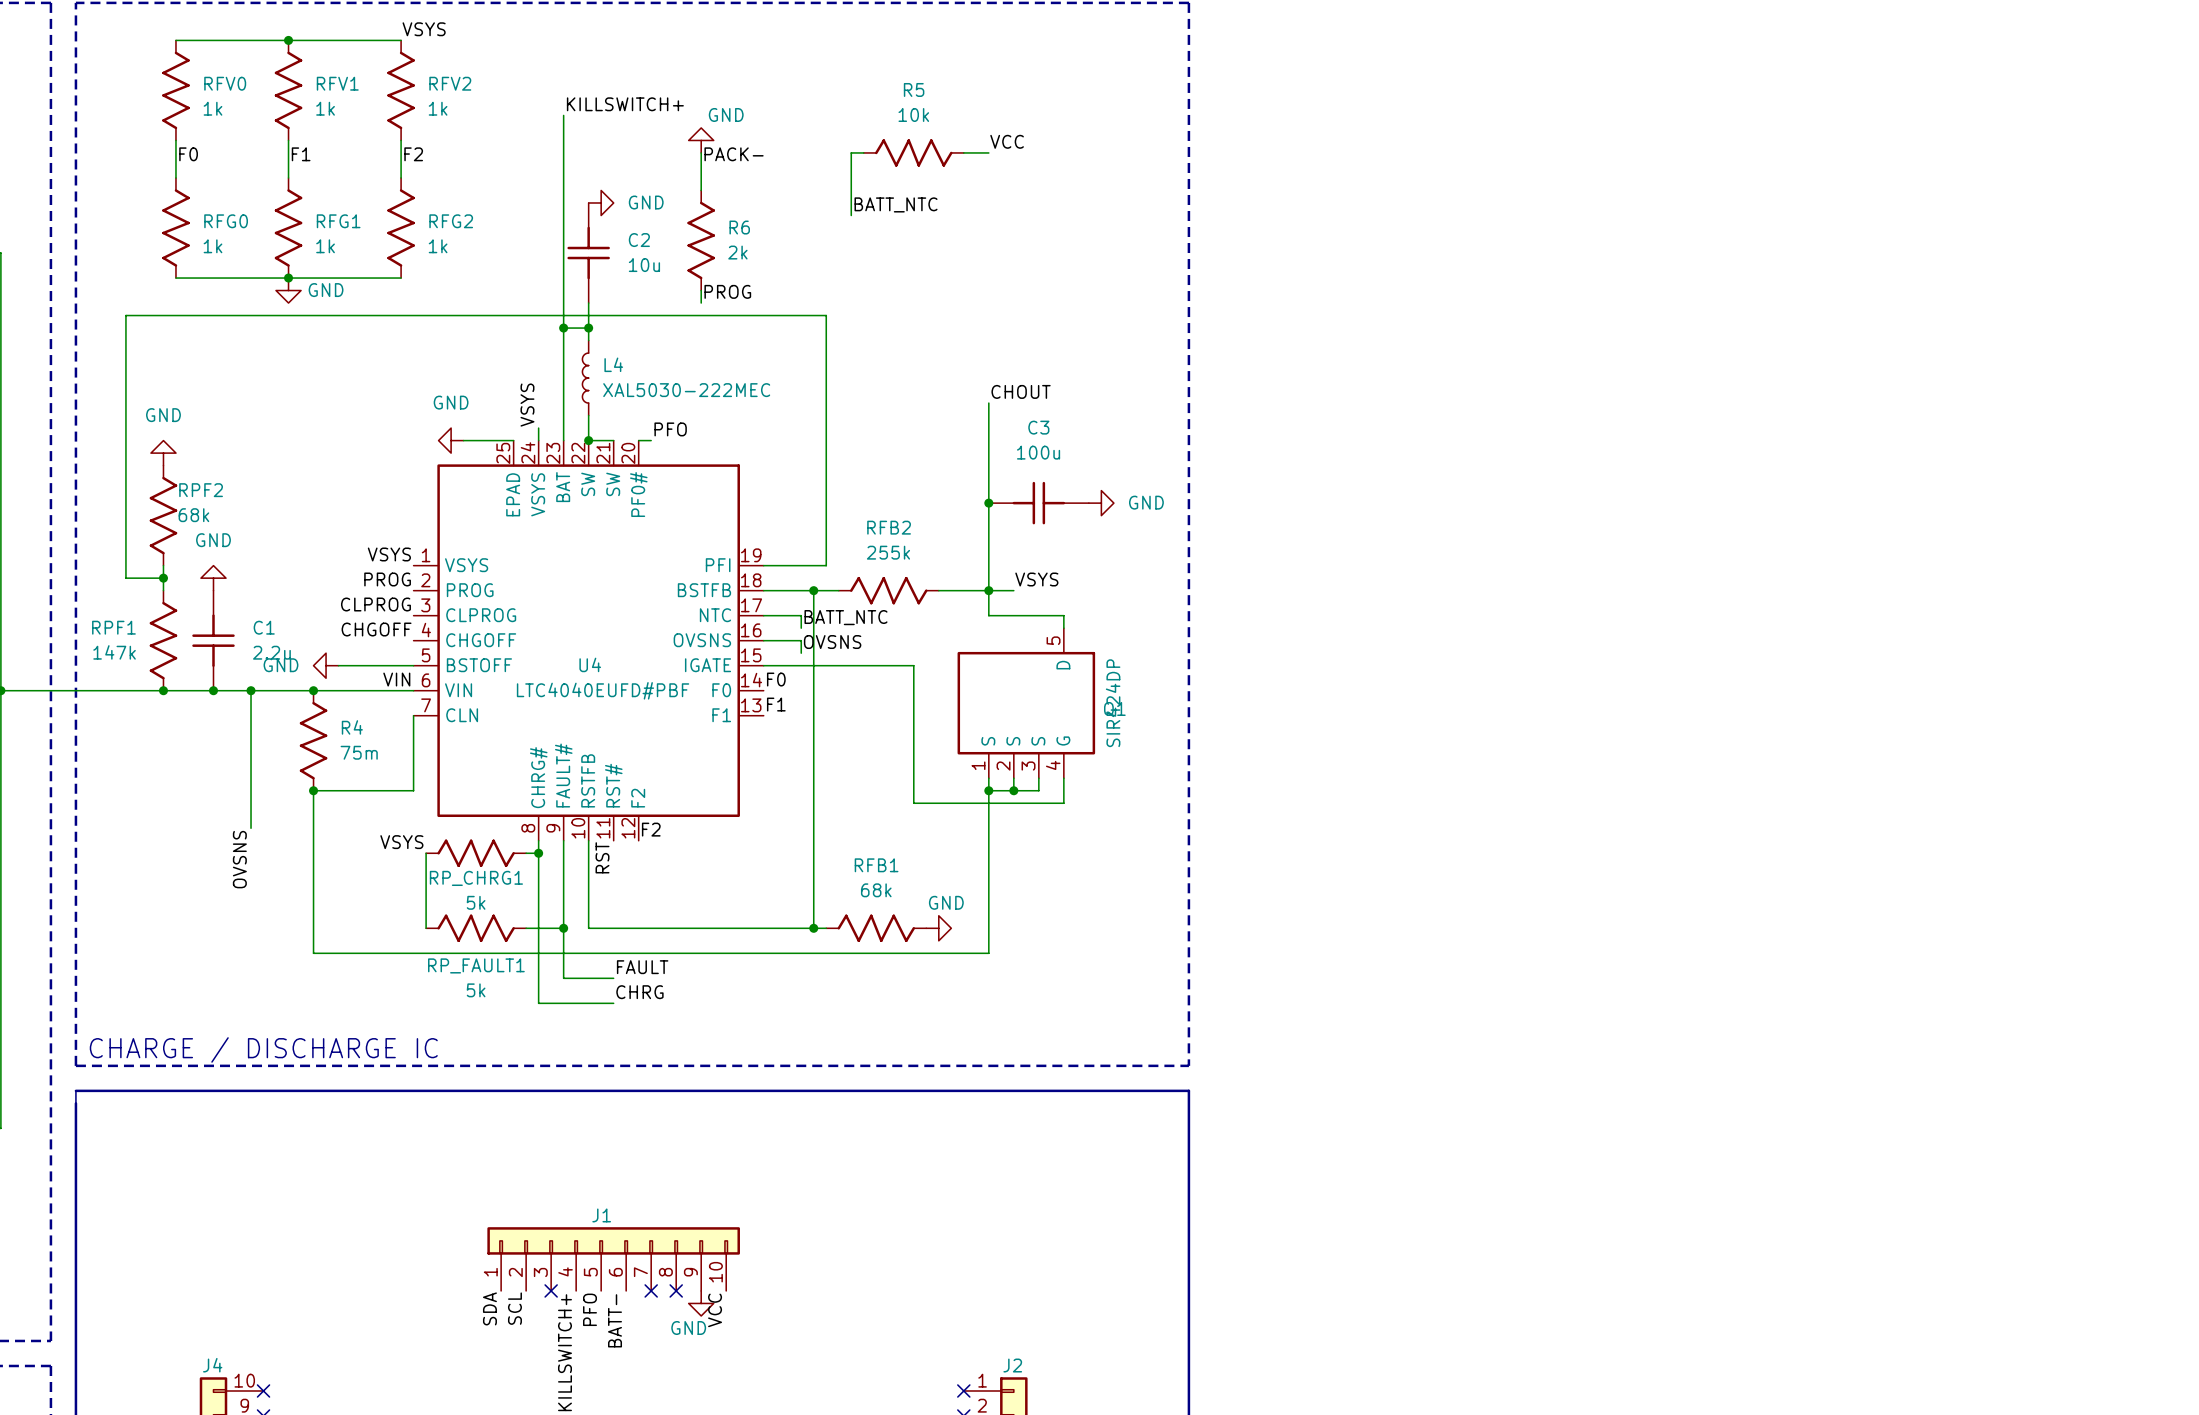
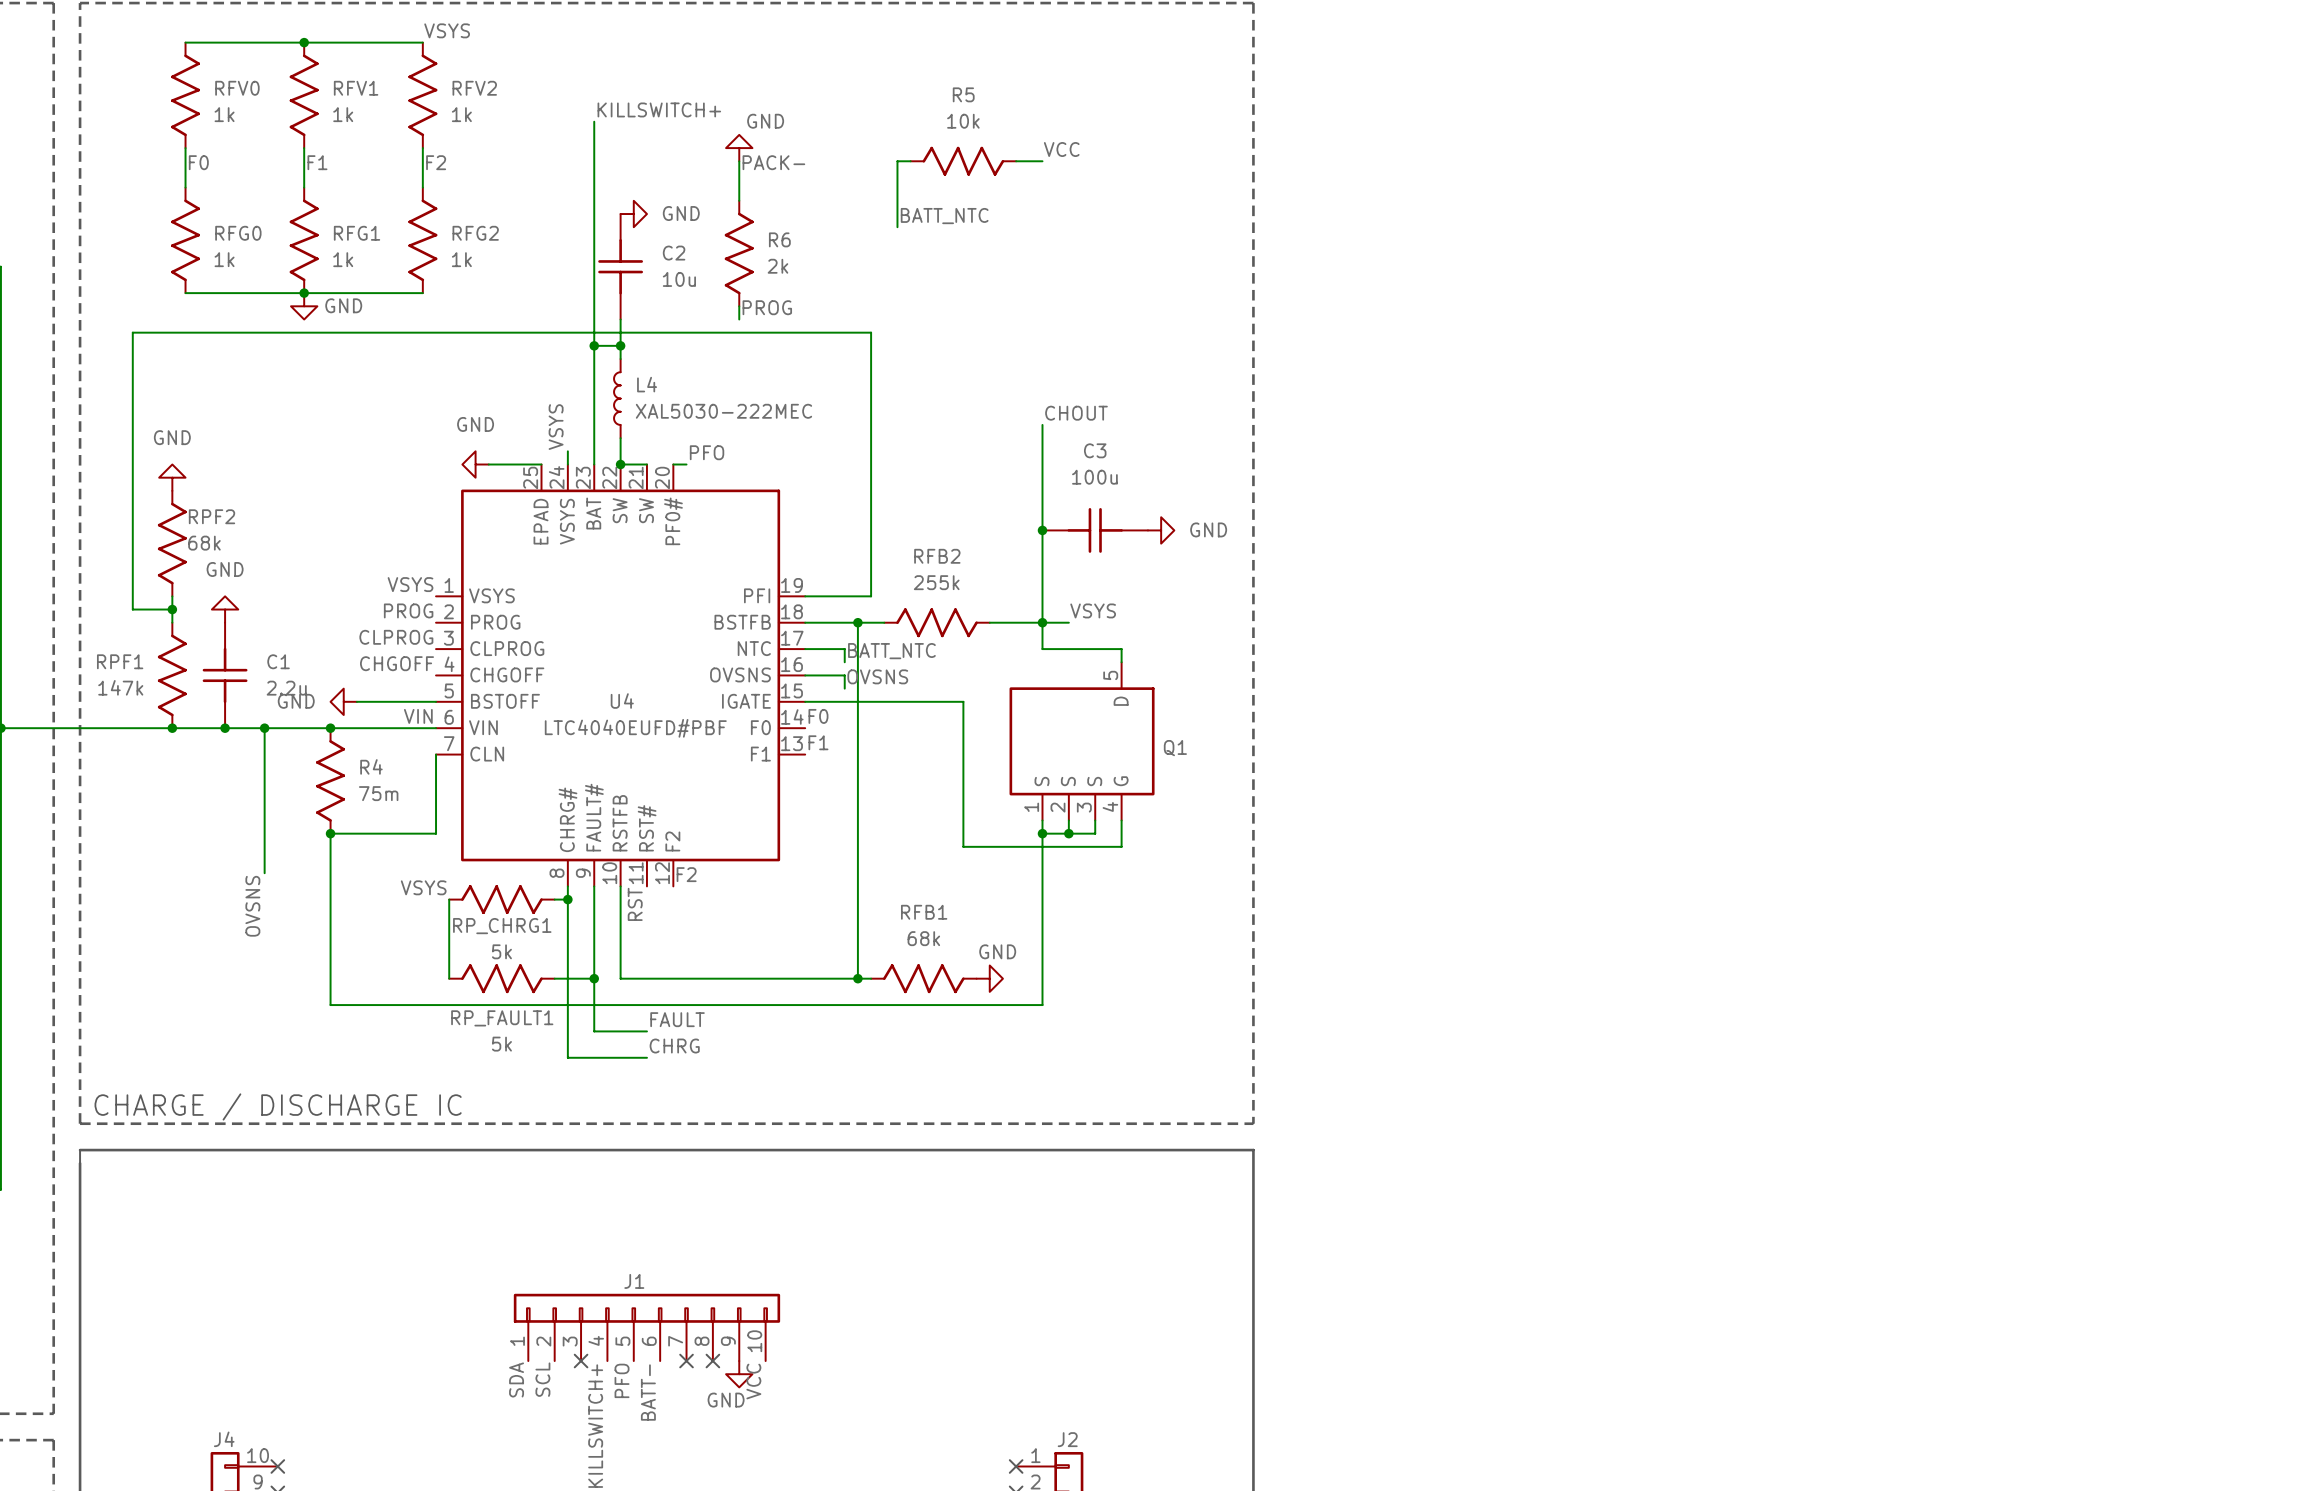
Q1 value: SIR424DP (1113, 703) -> none

